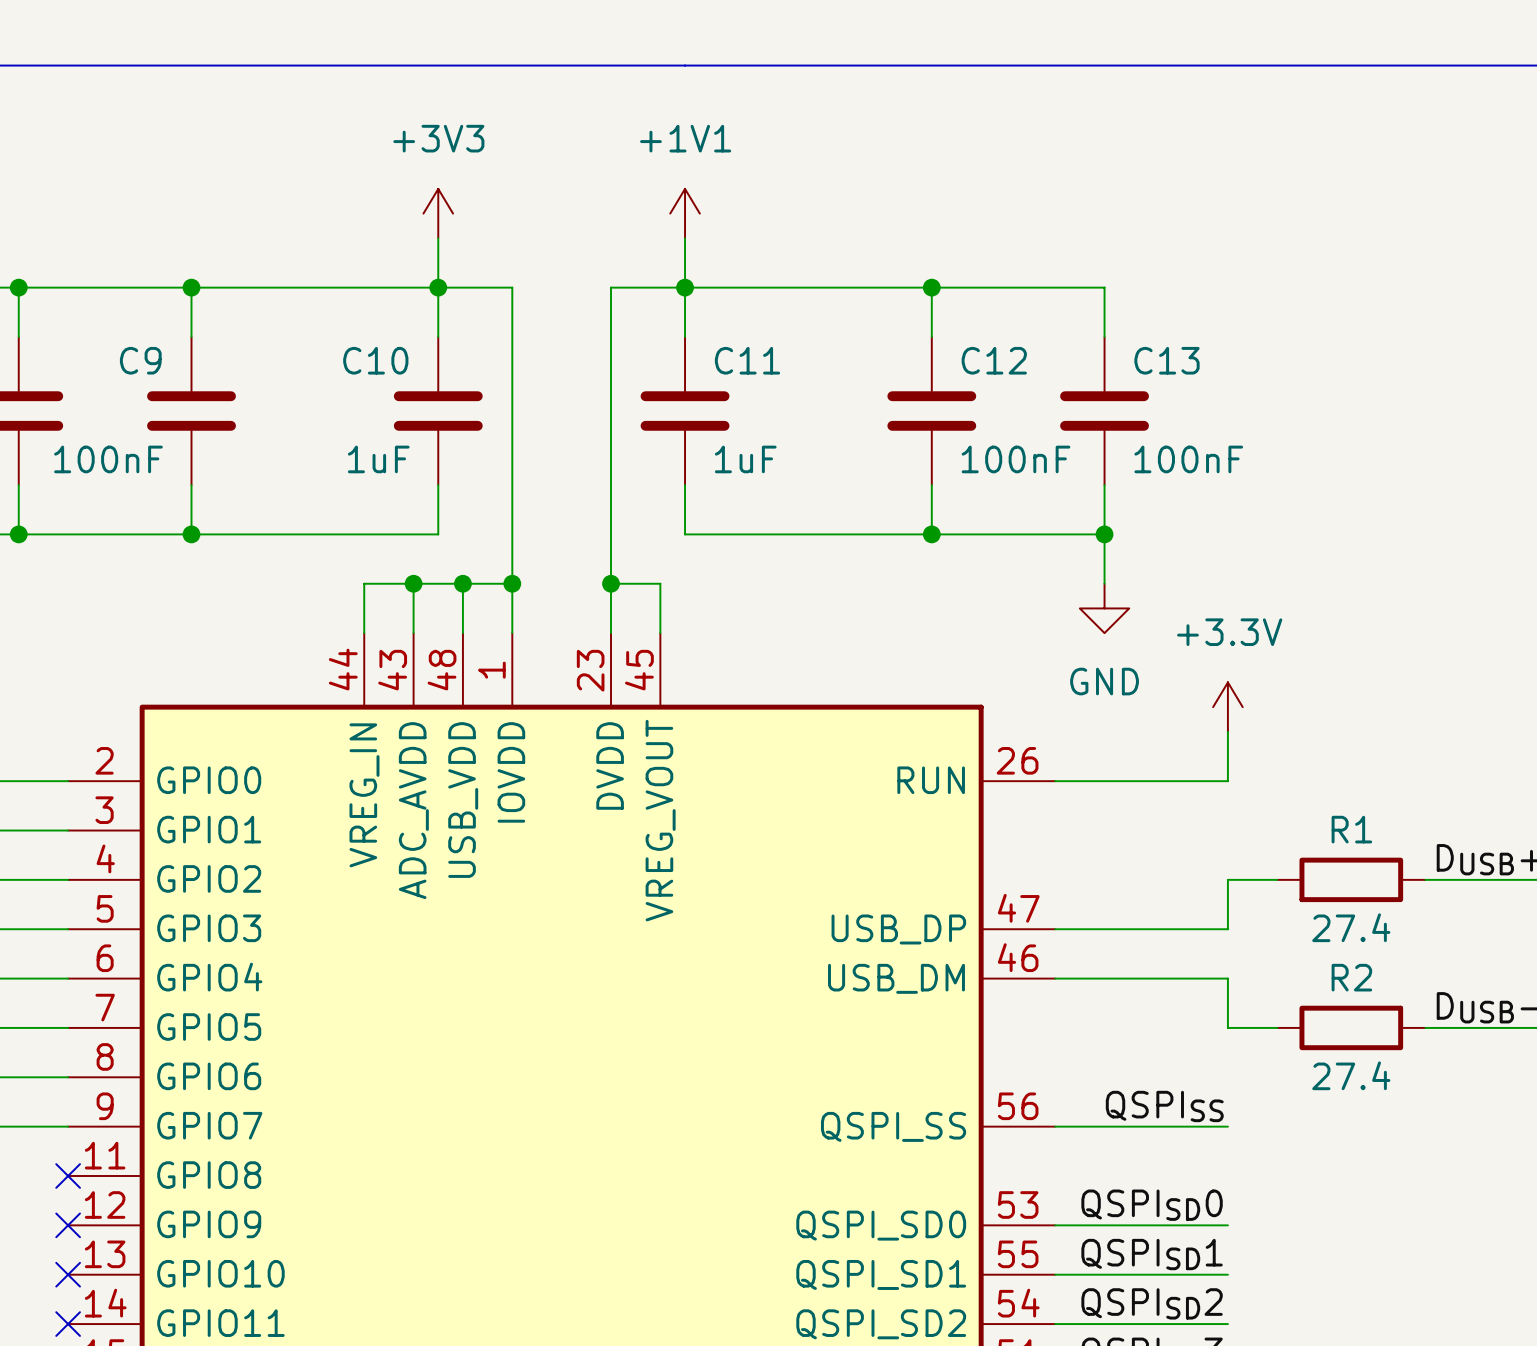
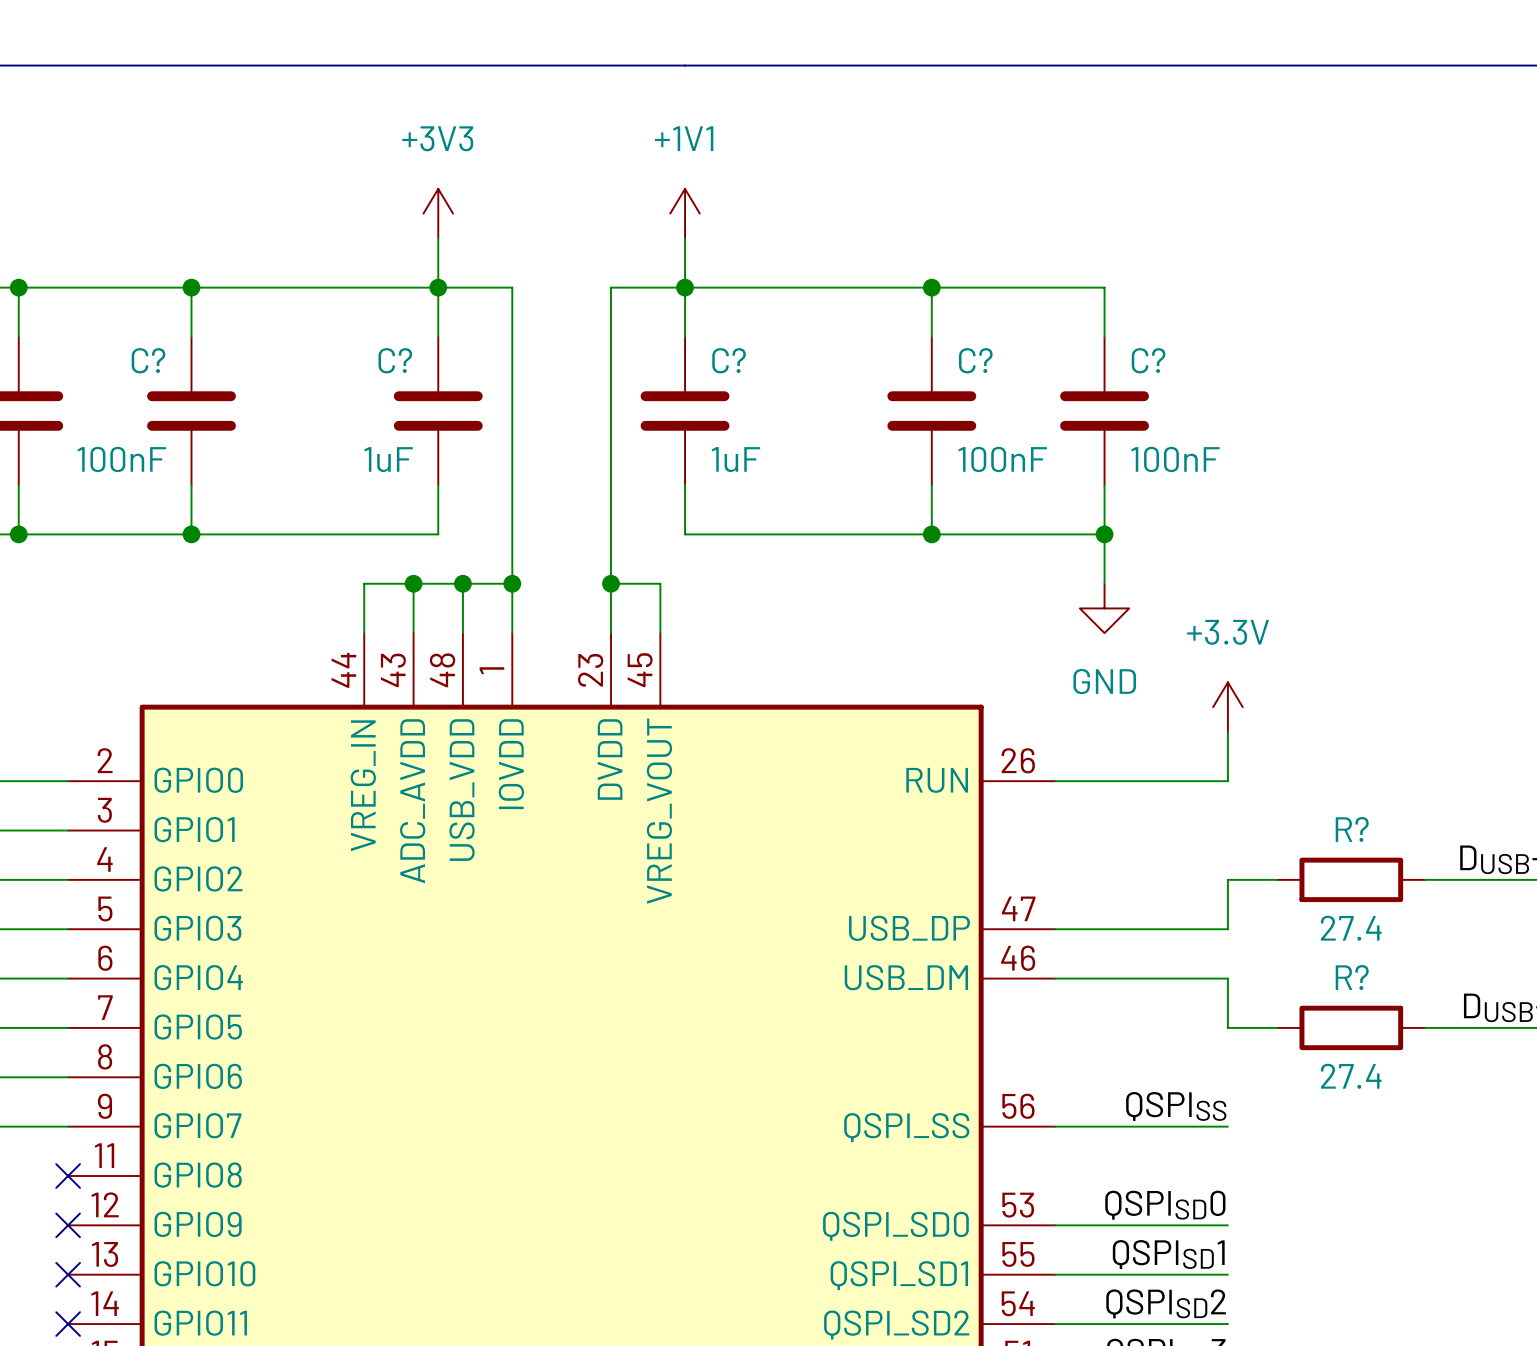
C9 name: C9 (140, 360) -> C? (148, 360)
C10 name: C10 (375, 360) -> C? (395, 360)
C11 name: C11 (747, 360) -> C? (729, 360)
C12 name: C12 (994, 360) -> C? (975, 360)
C13 name: C13 (1167, 360) -> C? (1148, 360)
R1 name: R1 (1351, 829) -> R? (1352, 829)
R2 name: R2 (1351, 977) -> R? (1352, 977)

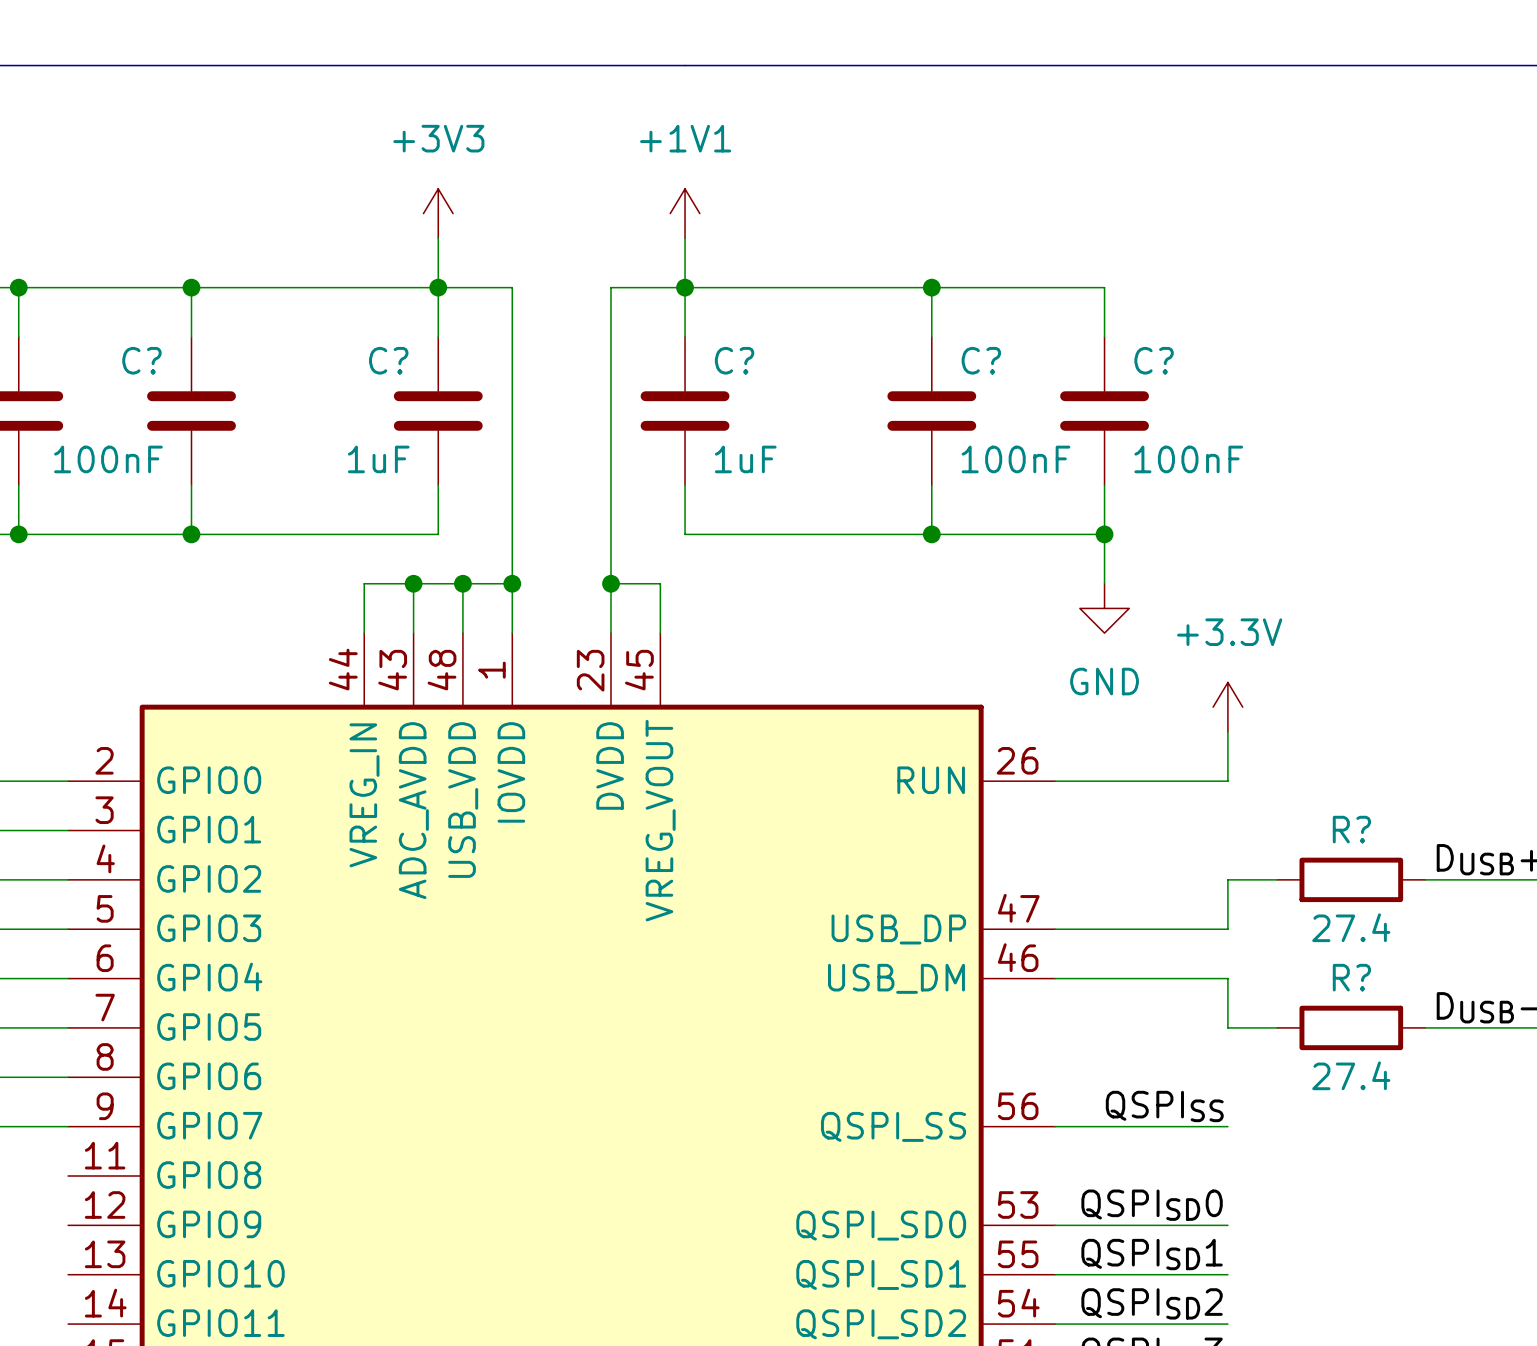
no-connect mark: (68, 1176) -> none
no-connect mark: (68, 1225) -> none
no-connect mark: (68, 1274) -> none
no-connect mark: (68, 1324) -> none

